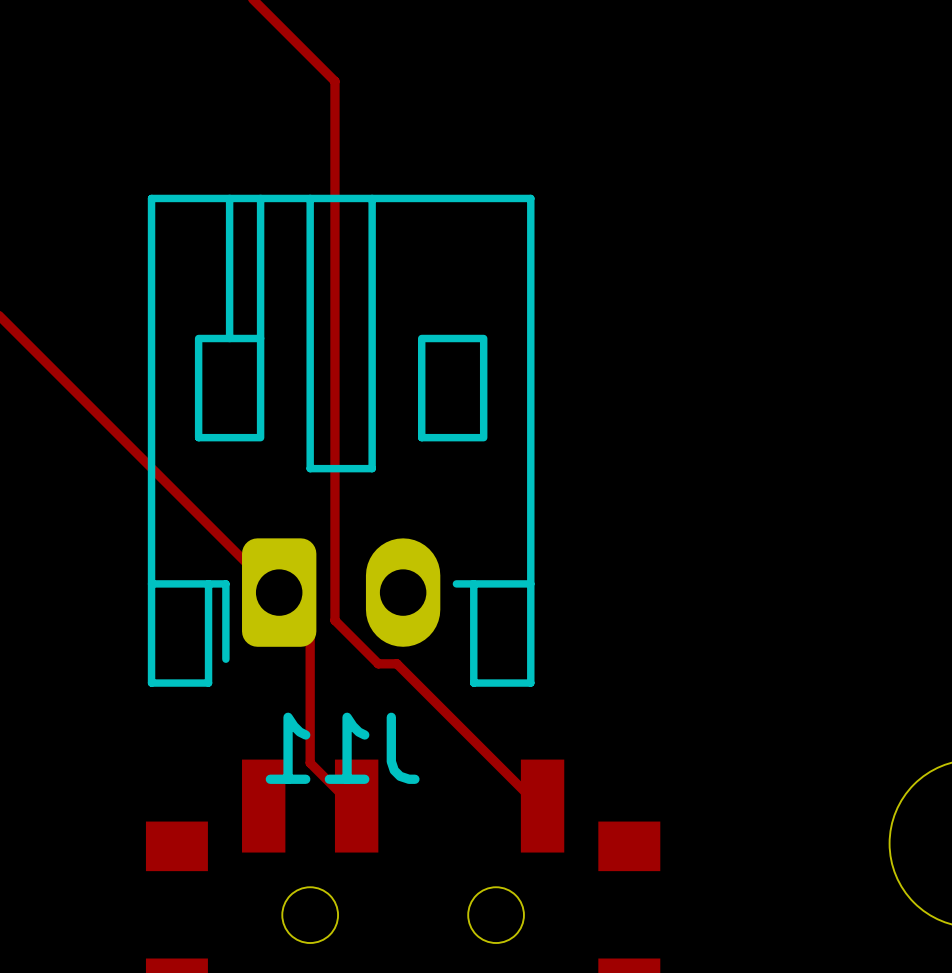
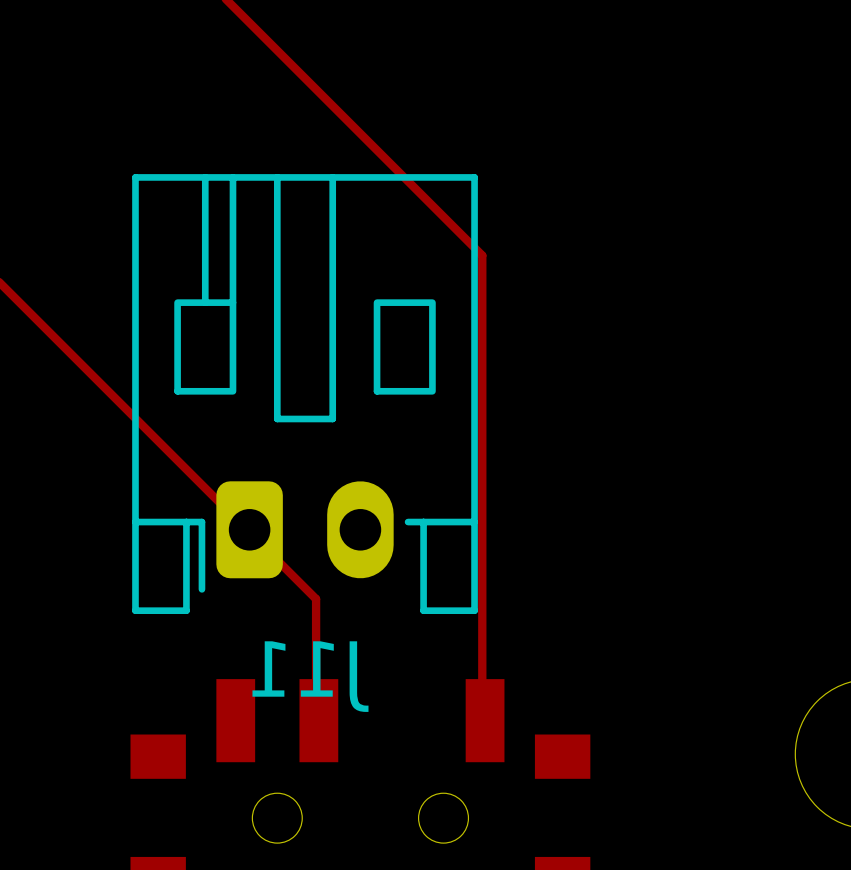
top track: (334, 81) (334, 620) (378, 663) (396, 663) (539, 806) -> (299, 72) (482, 255) (482, 720)
top track: (310, 626) (310, 762) (353, 806) -> (277, 560) (316, 599) (316, 720)

